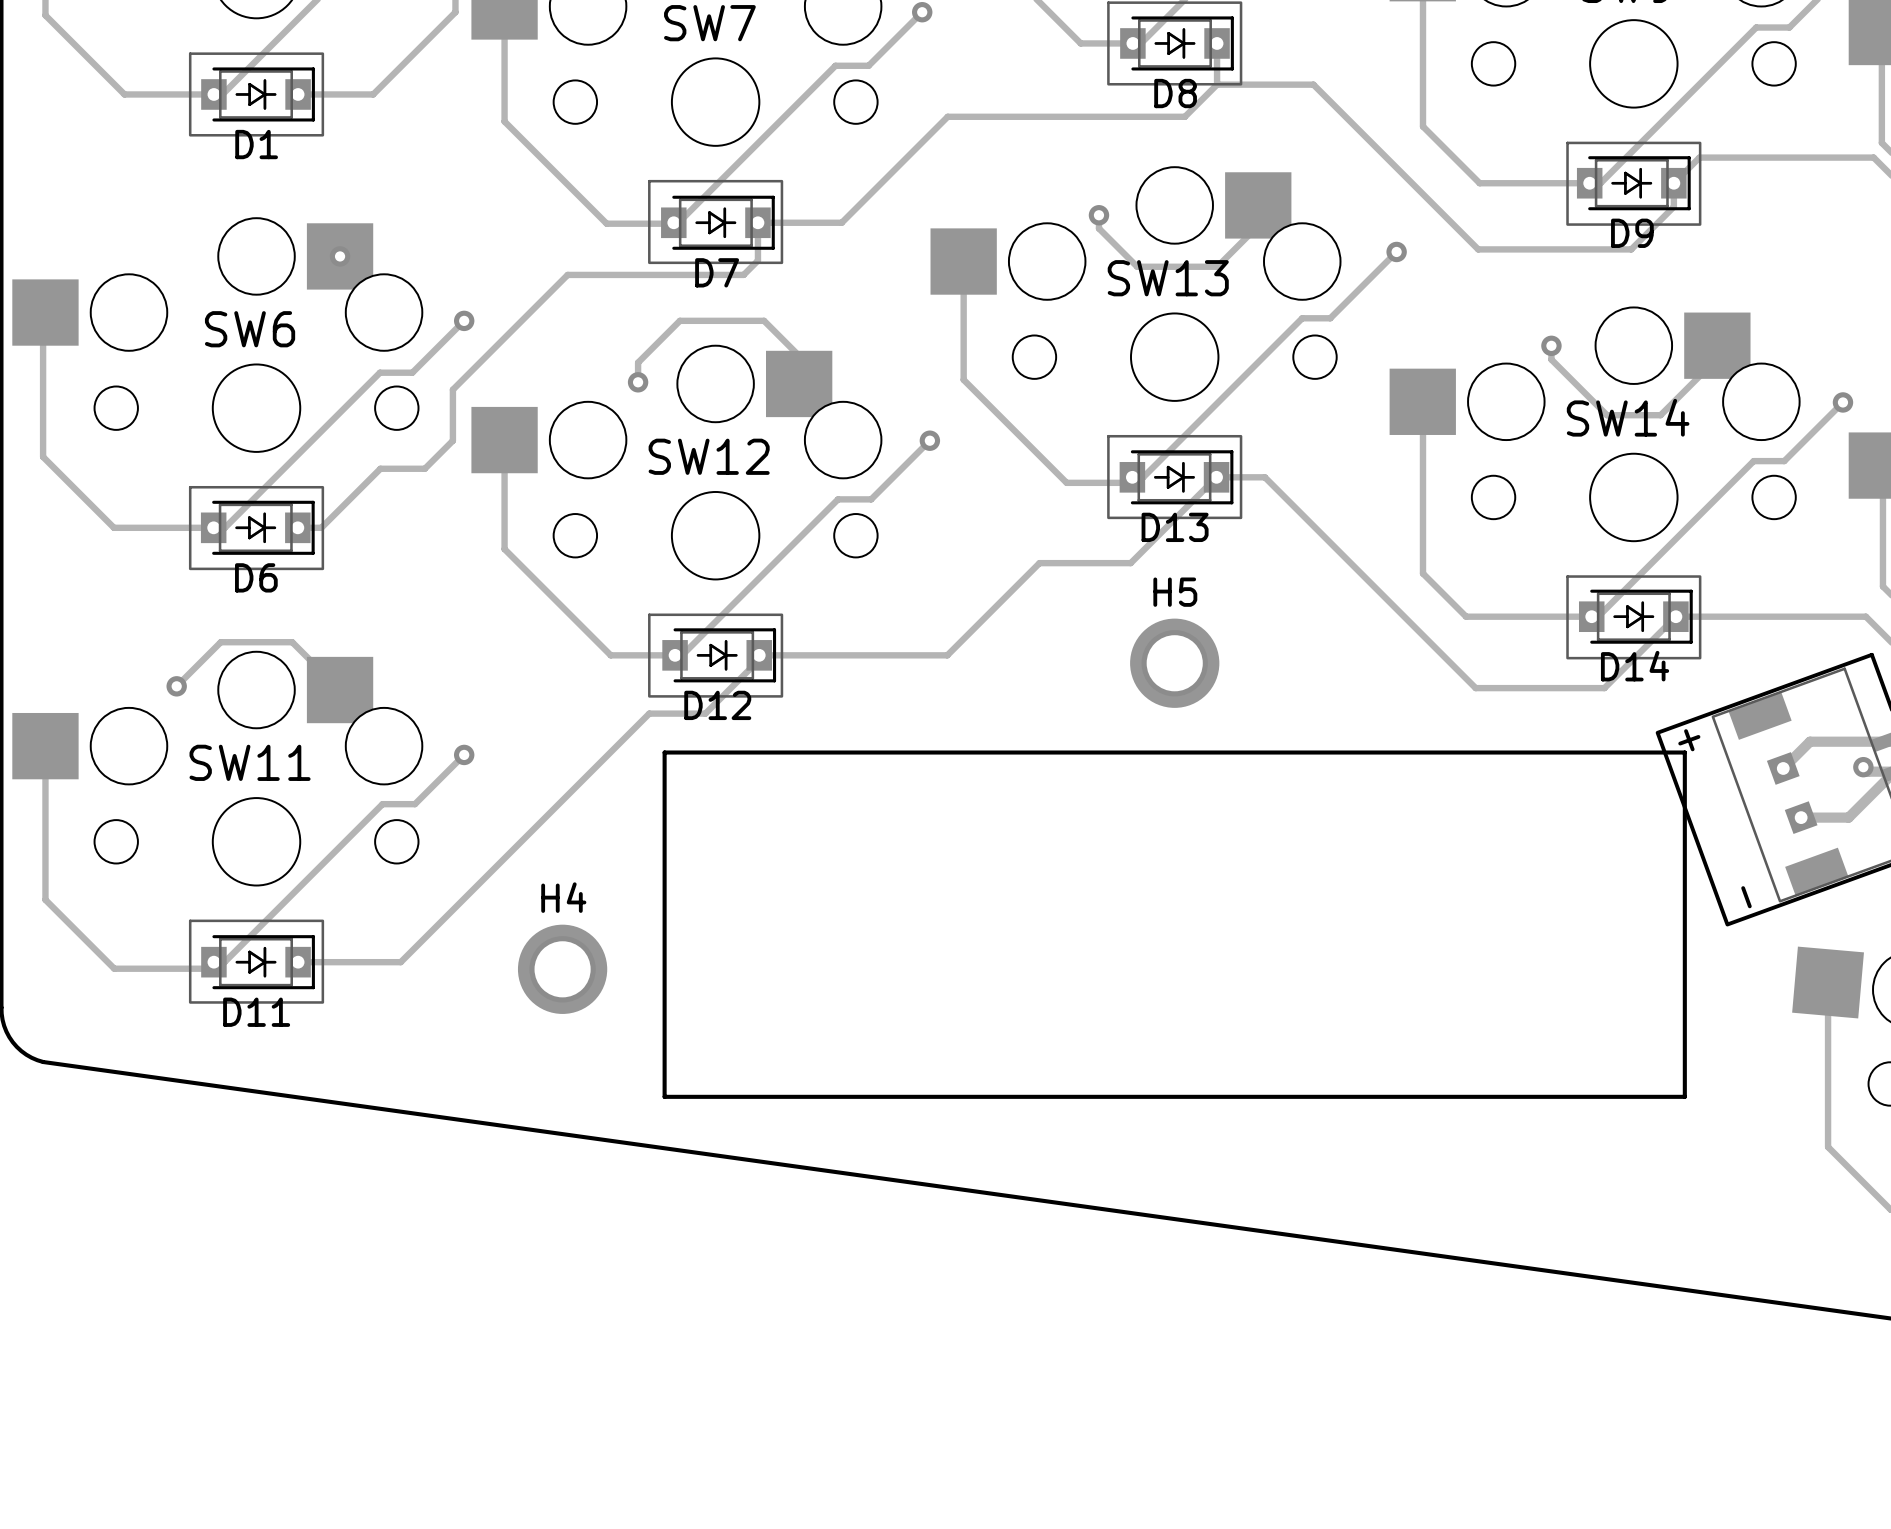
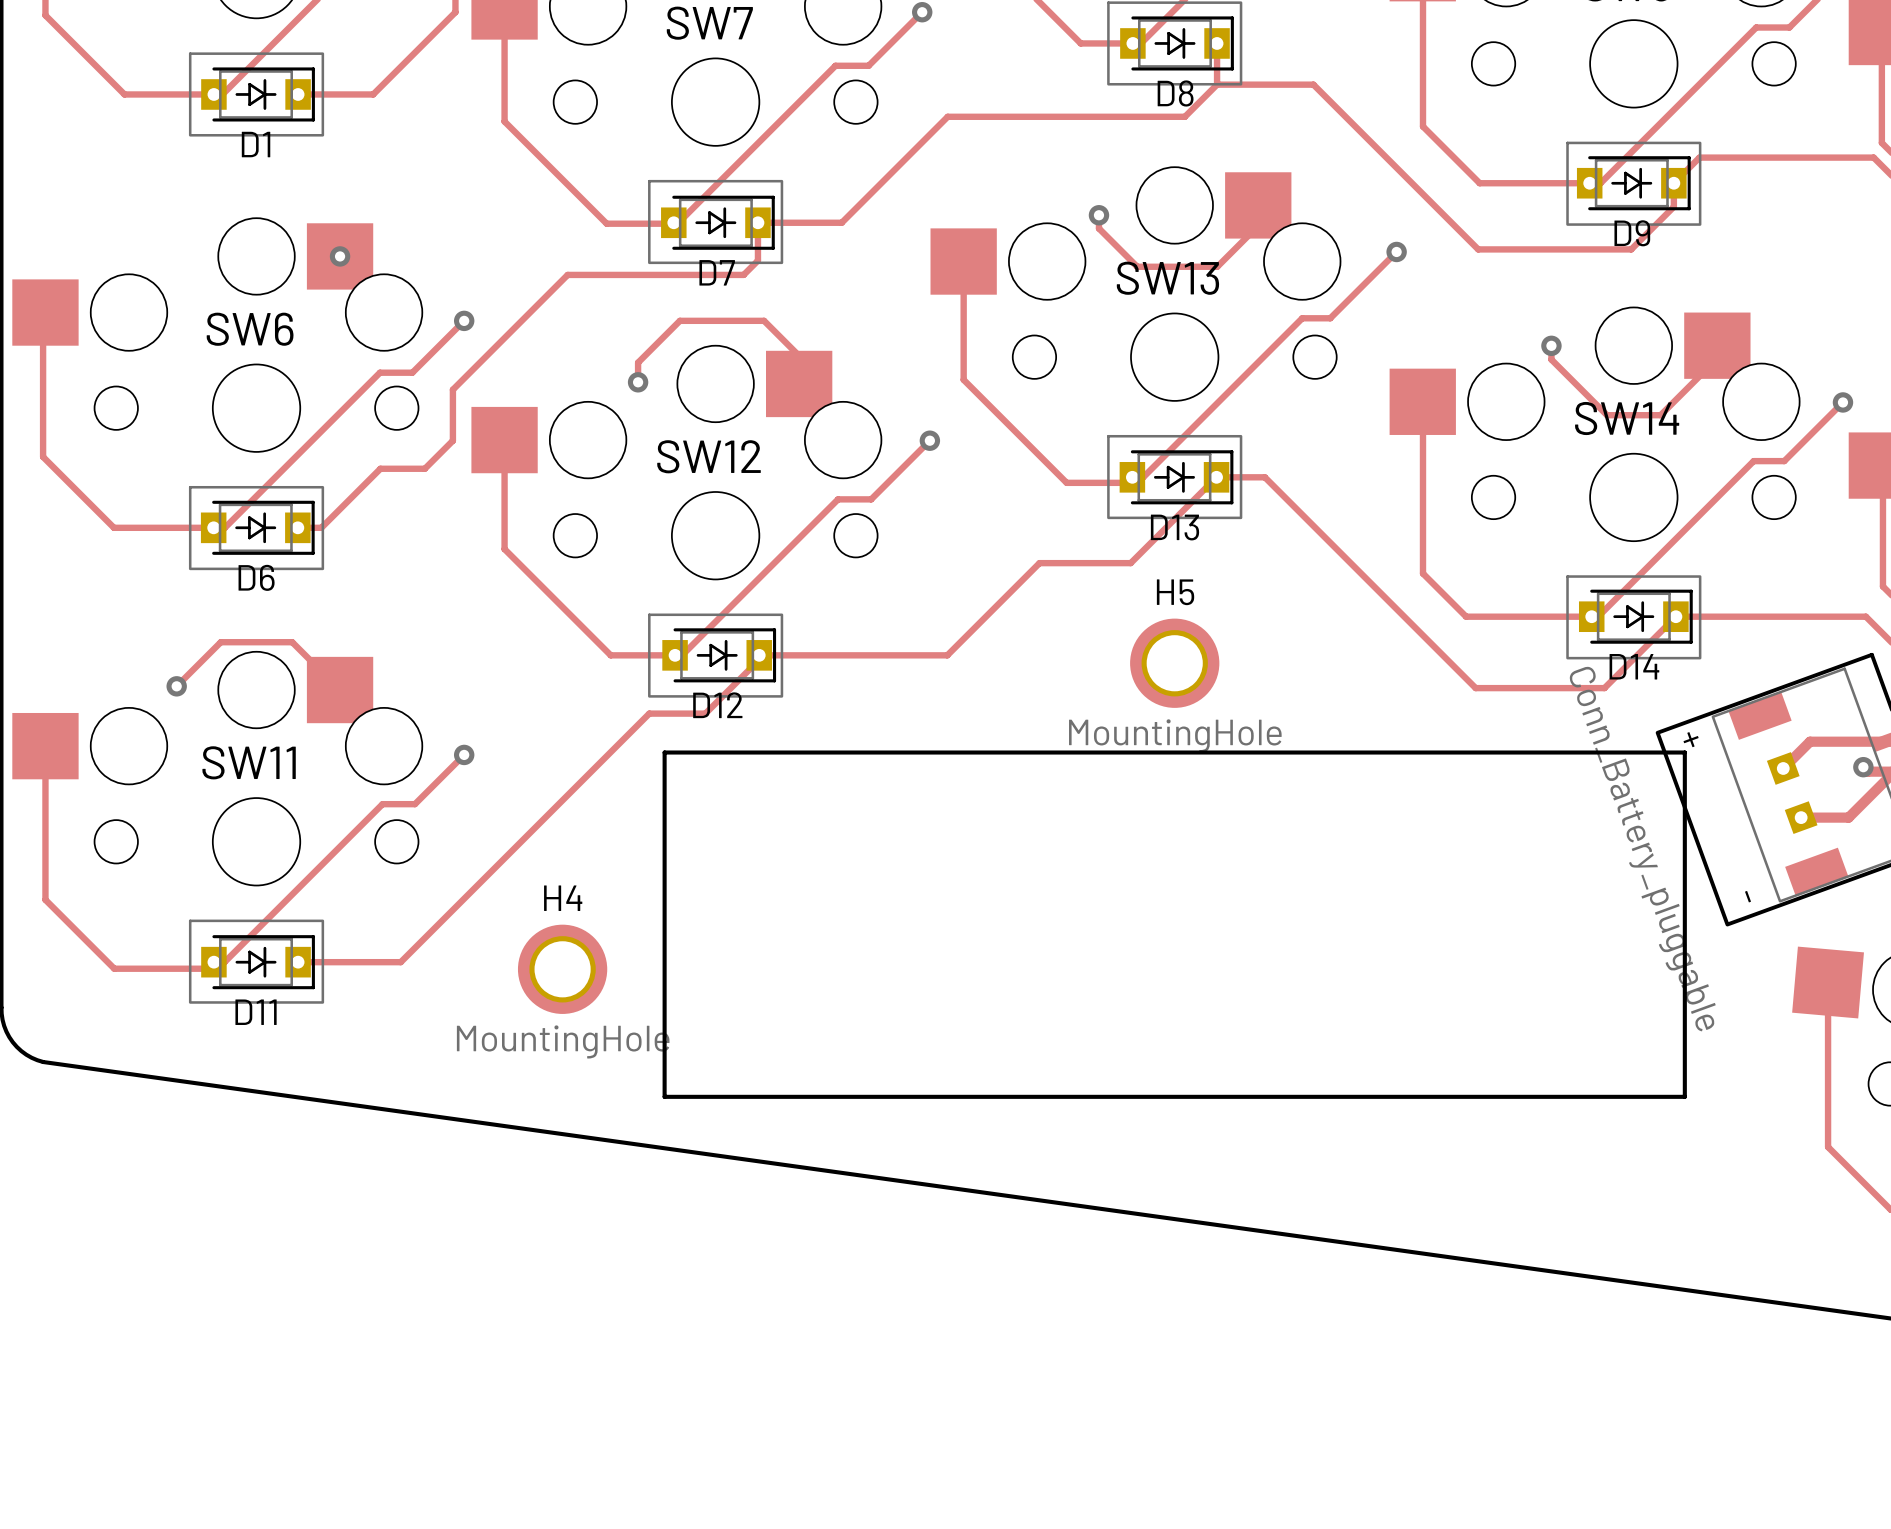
H5 value: none -> MountingHole (1175, 735)
part value: none -> Conn_Battery_pluggable (1642, 848)
H4 value: none -> MountingHole (563, 1041)

